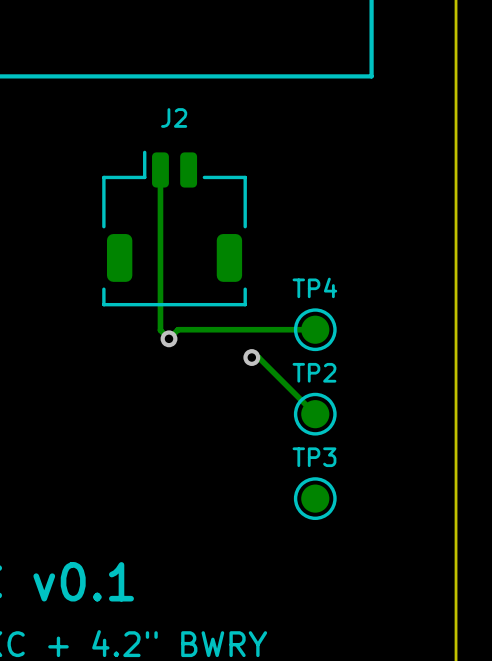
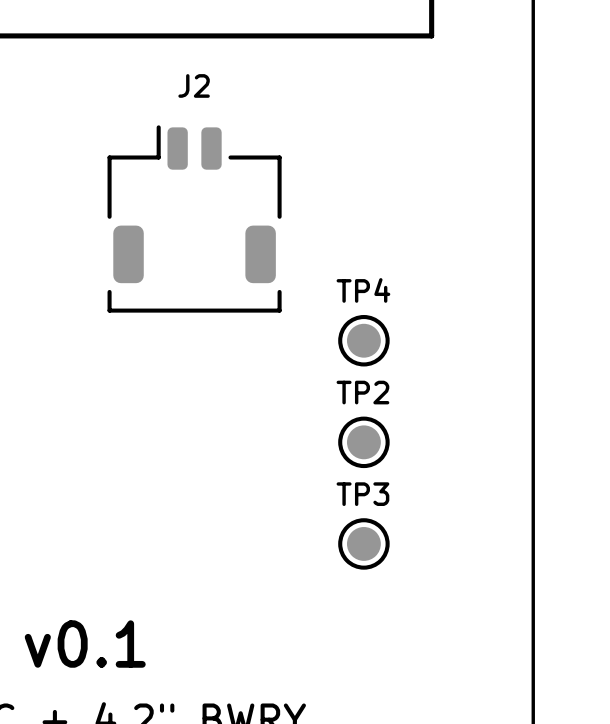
track: (160, 169) (160, 330) (169, 338) (178, 329) (315, 329) -> none
via: (169, 338) -> none
track: (251, 357) (258, 357) (315, 414) -> none
via: (251, 357) -> none

